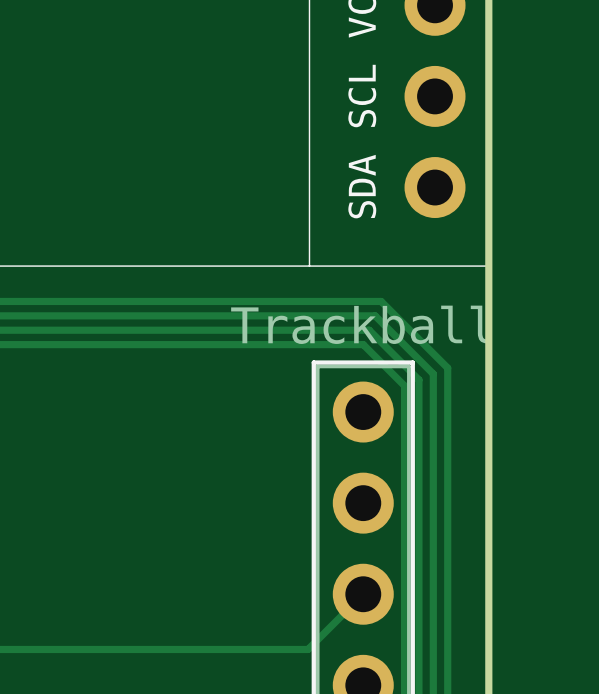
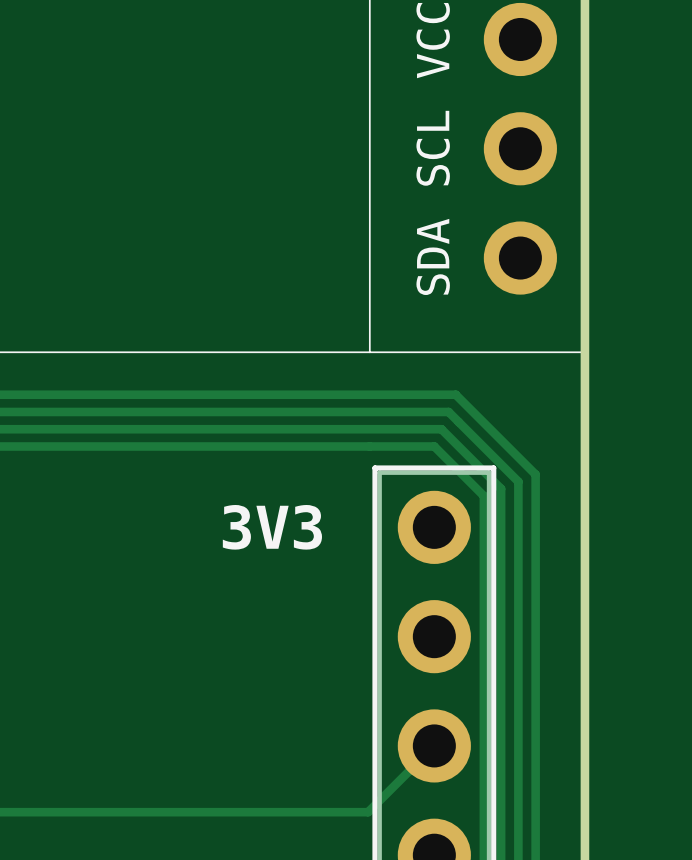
part value: Trackball (361, 324) -> none
text: none -> 3V3 (272, 527)

